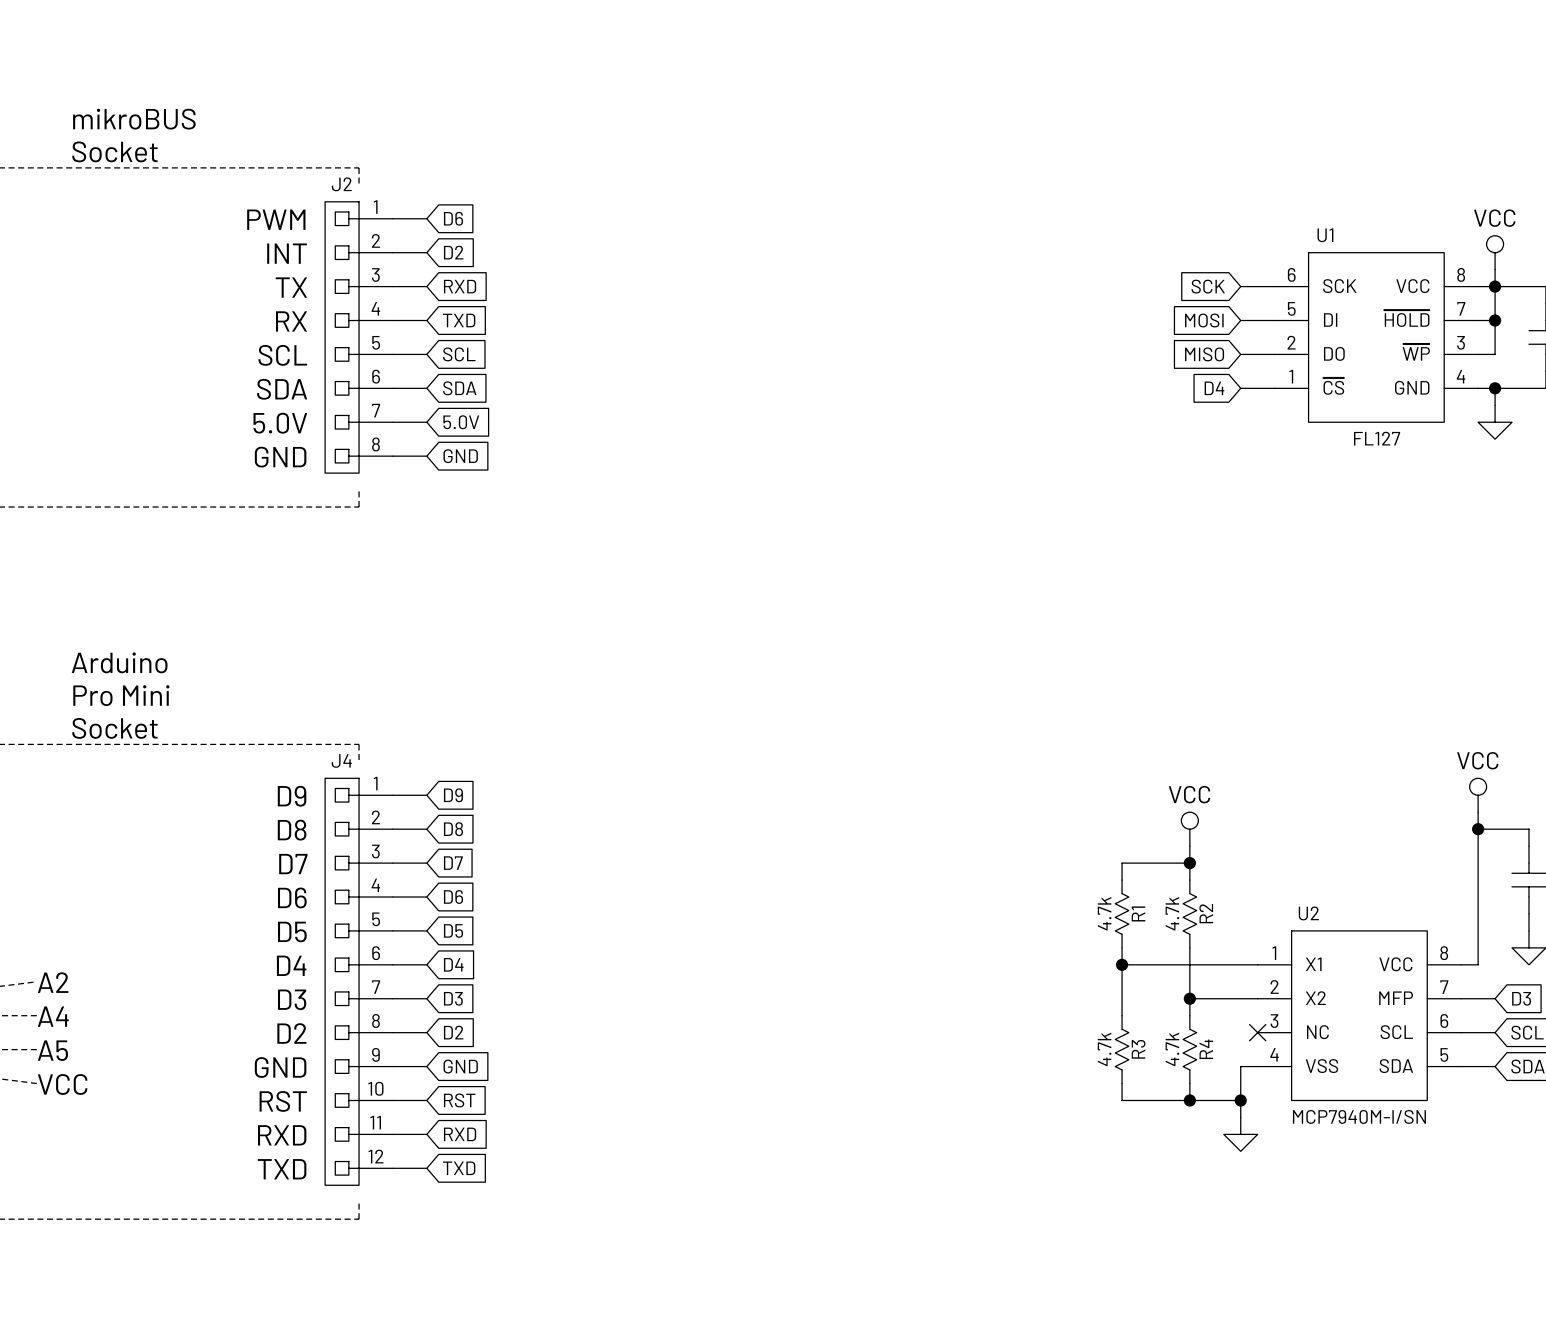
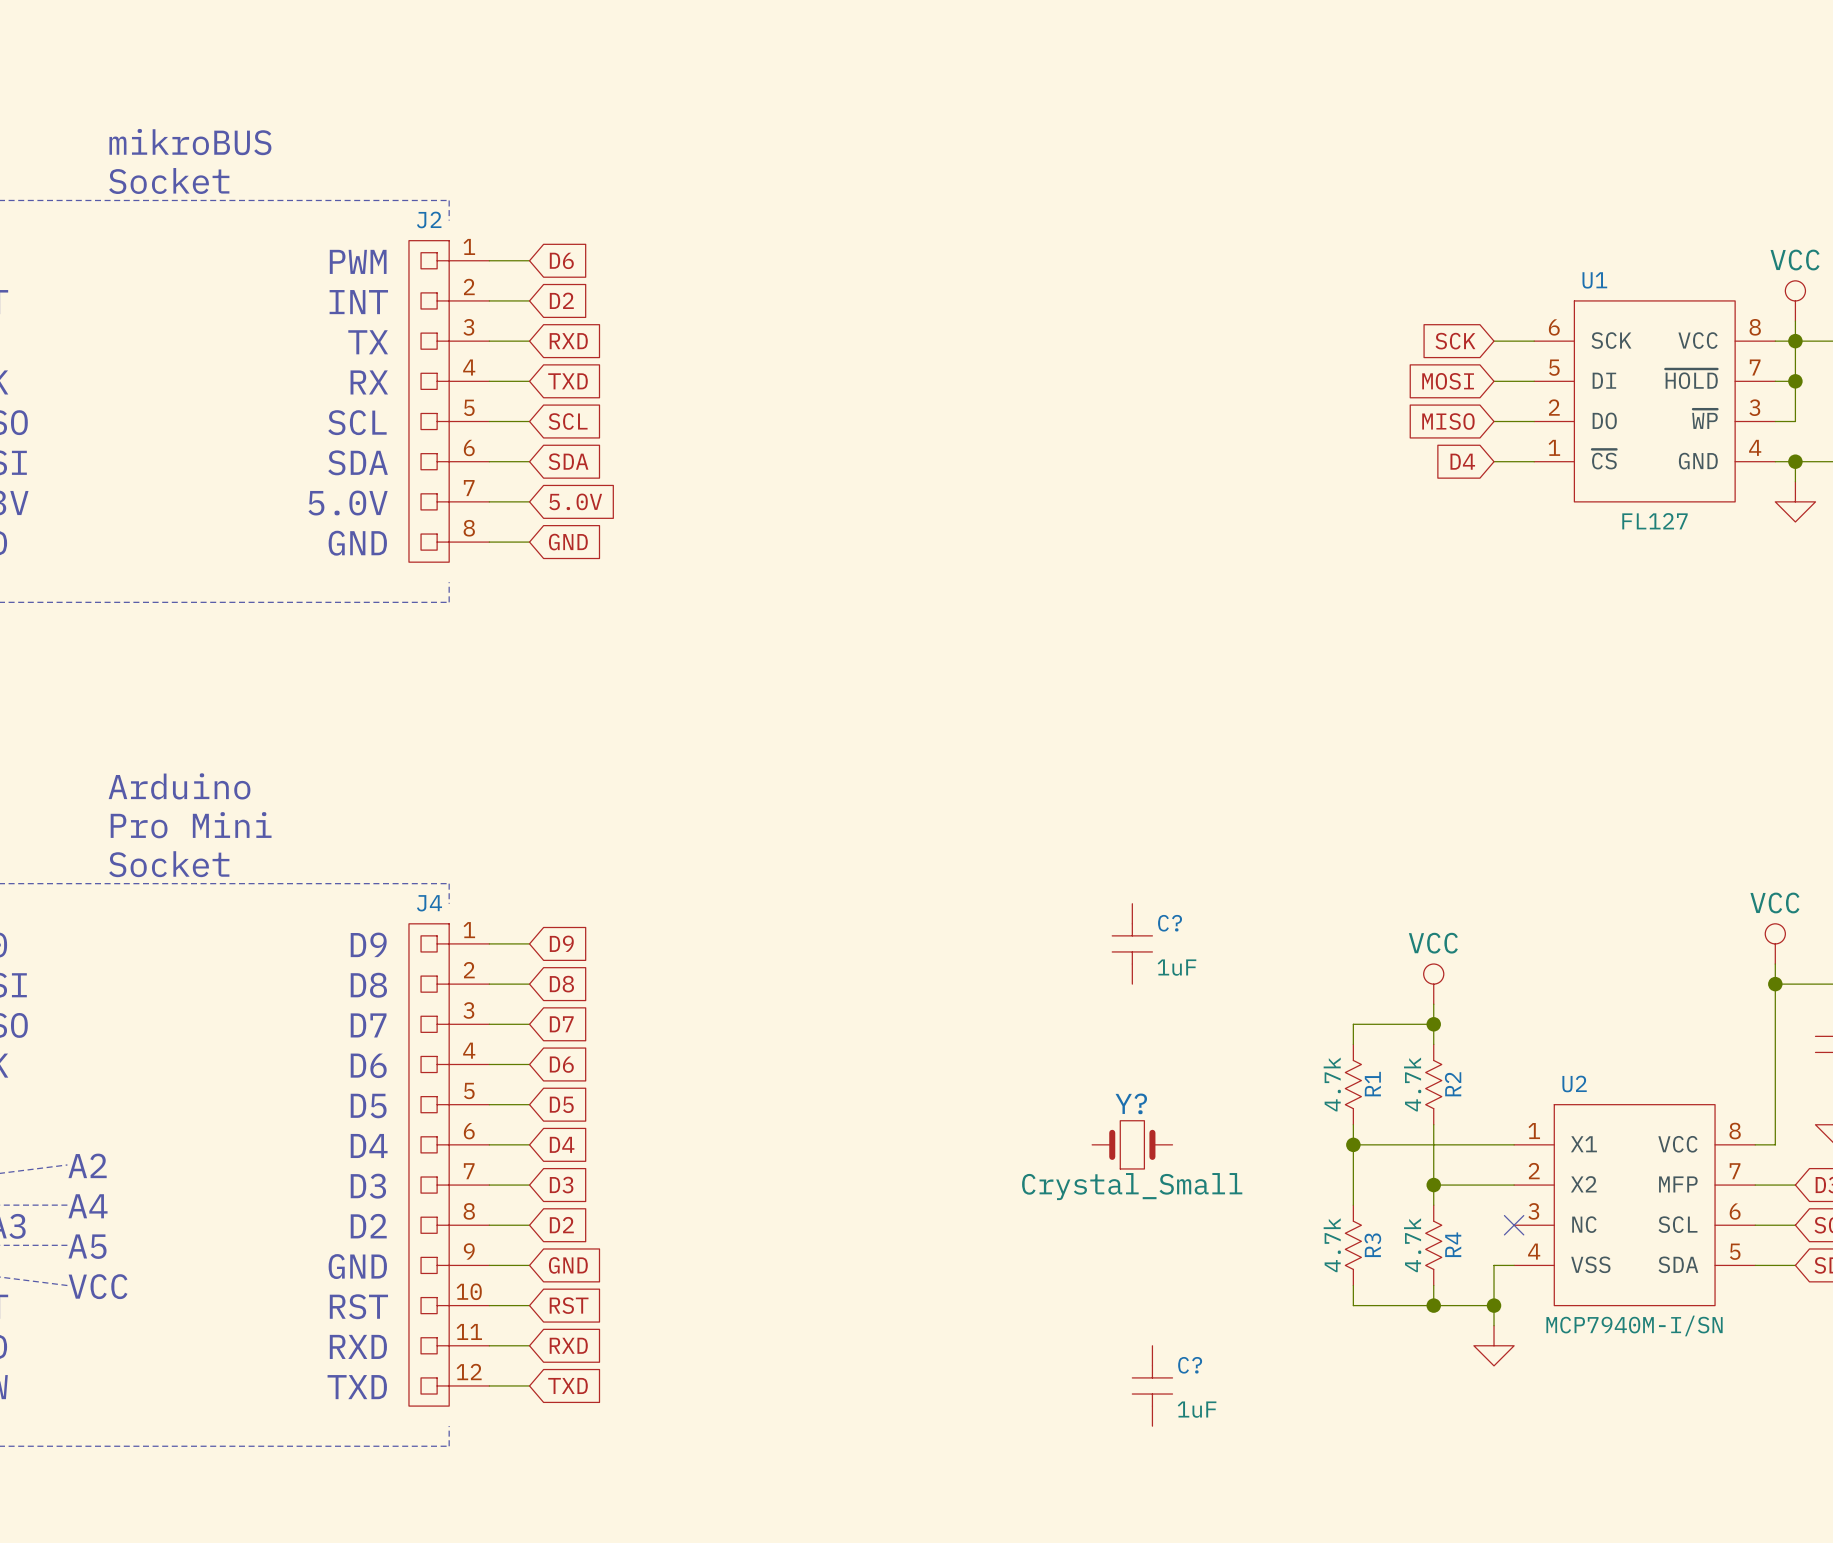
C?: none -> 1uF (1132, 943)
Y?: none -> Crystal_Small (1132, 1144)
C?: none -> 1uF (1152, 1385)

